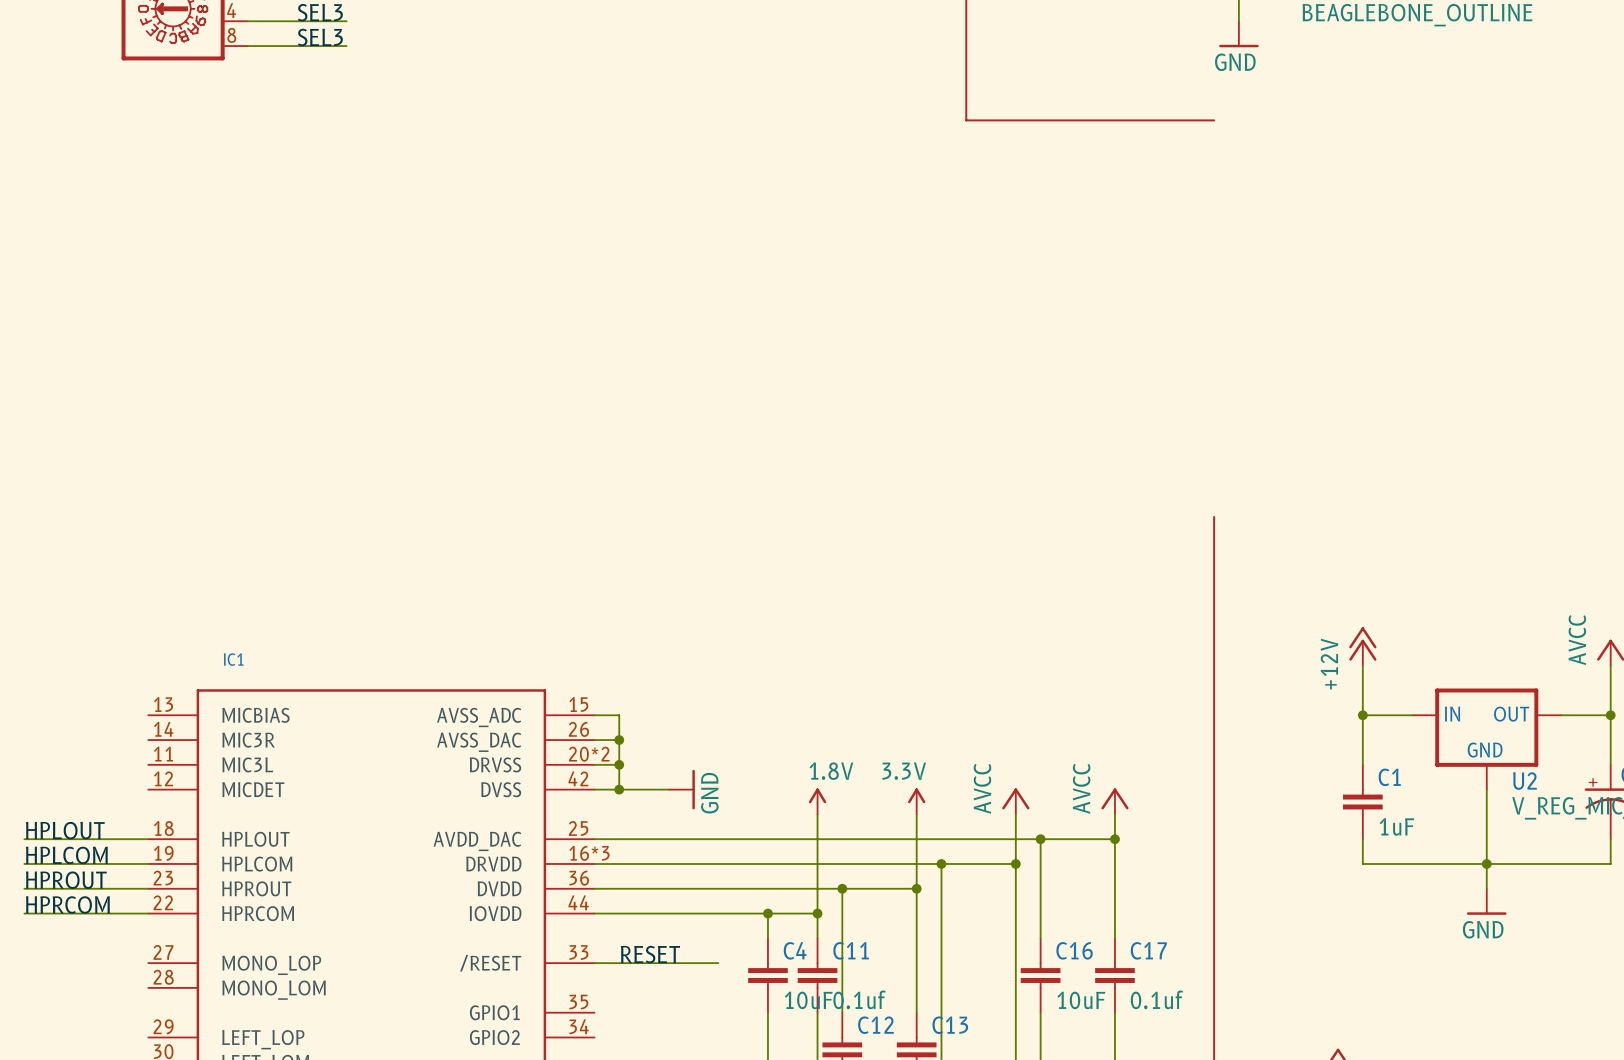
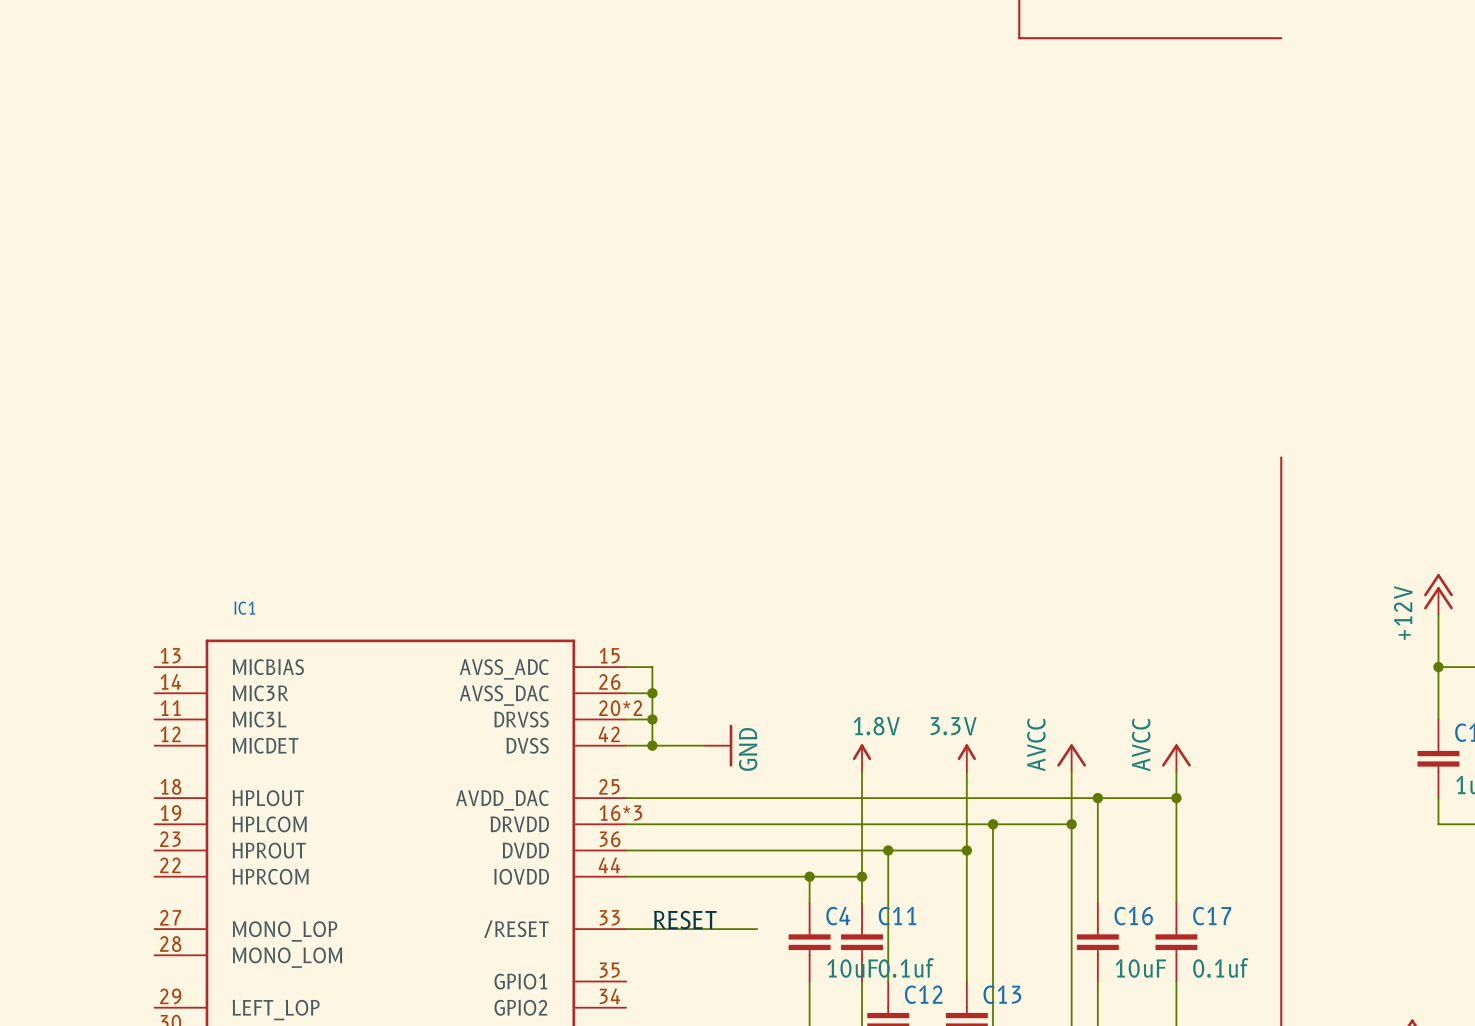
label: HPLOUT (65, 830) -> none
wire: (24, 839) (148, 839) -> none
label: HPLCOM (66, 855) -> none
wire: (24, 863) (148, 863) -> none
label: HPROUT (66, 880) -> none
wire: (24, 888) (148, 888) -> none
label: HPRCOM (67, 904) -> none
wire: (24, 913) (148, 913) -> none

